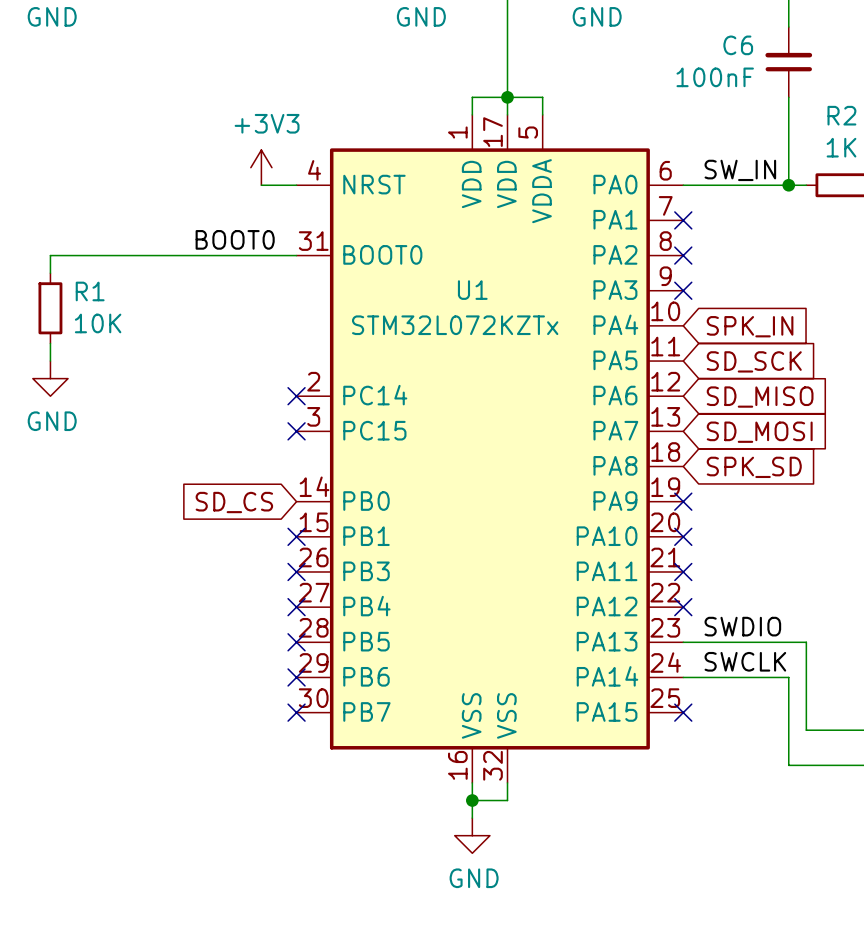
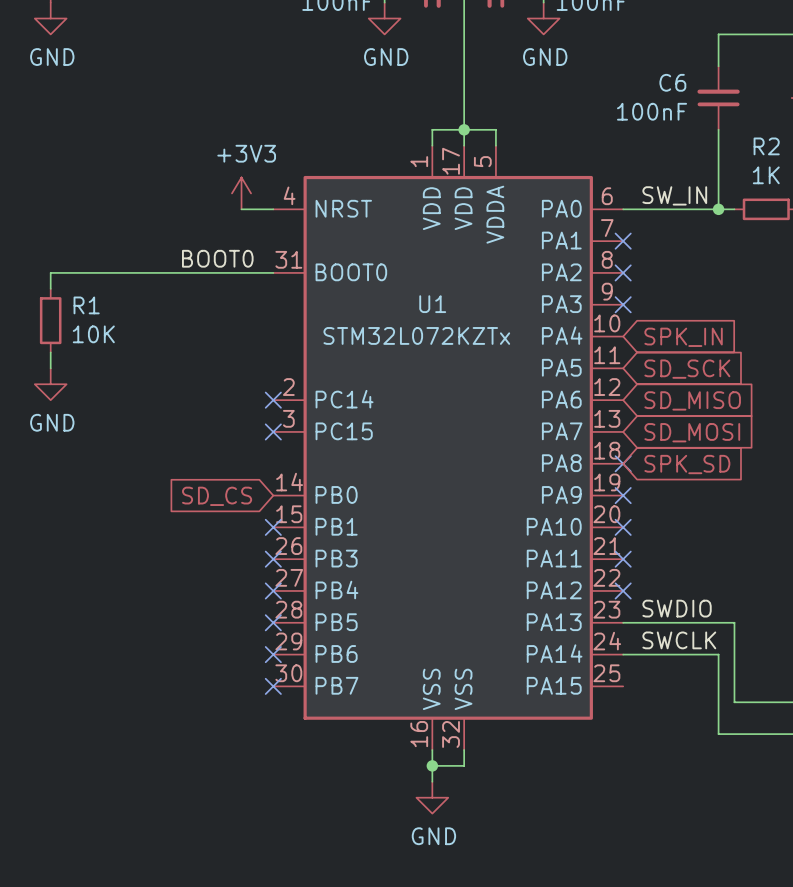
no-connect mark: none -> (623, 463)
no-connect mark: (683, 712) -> none

